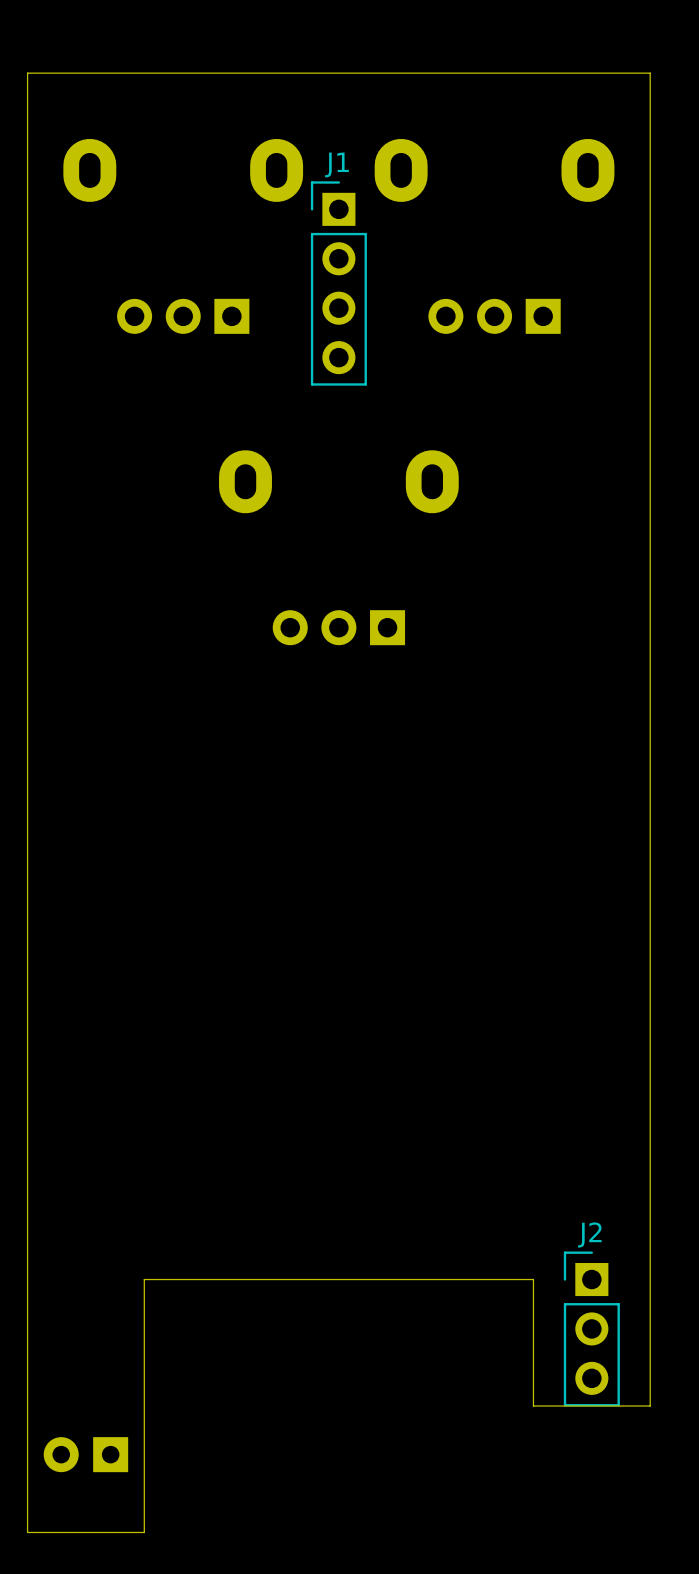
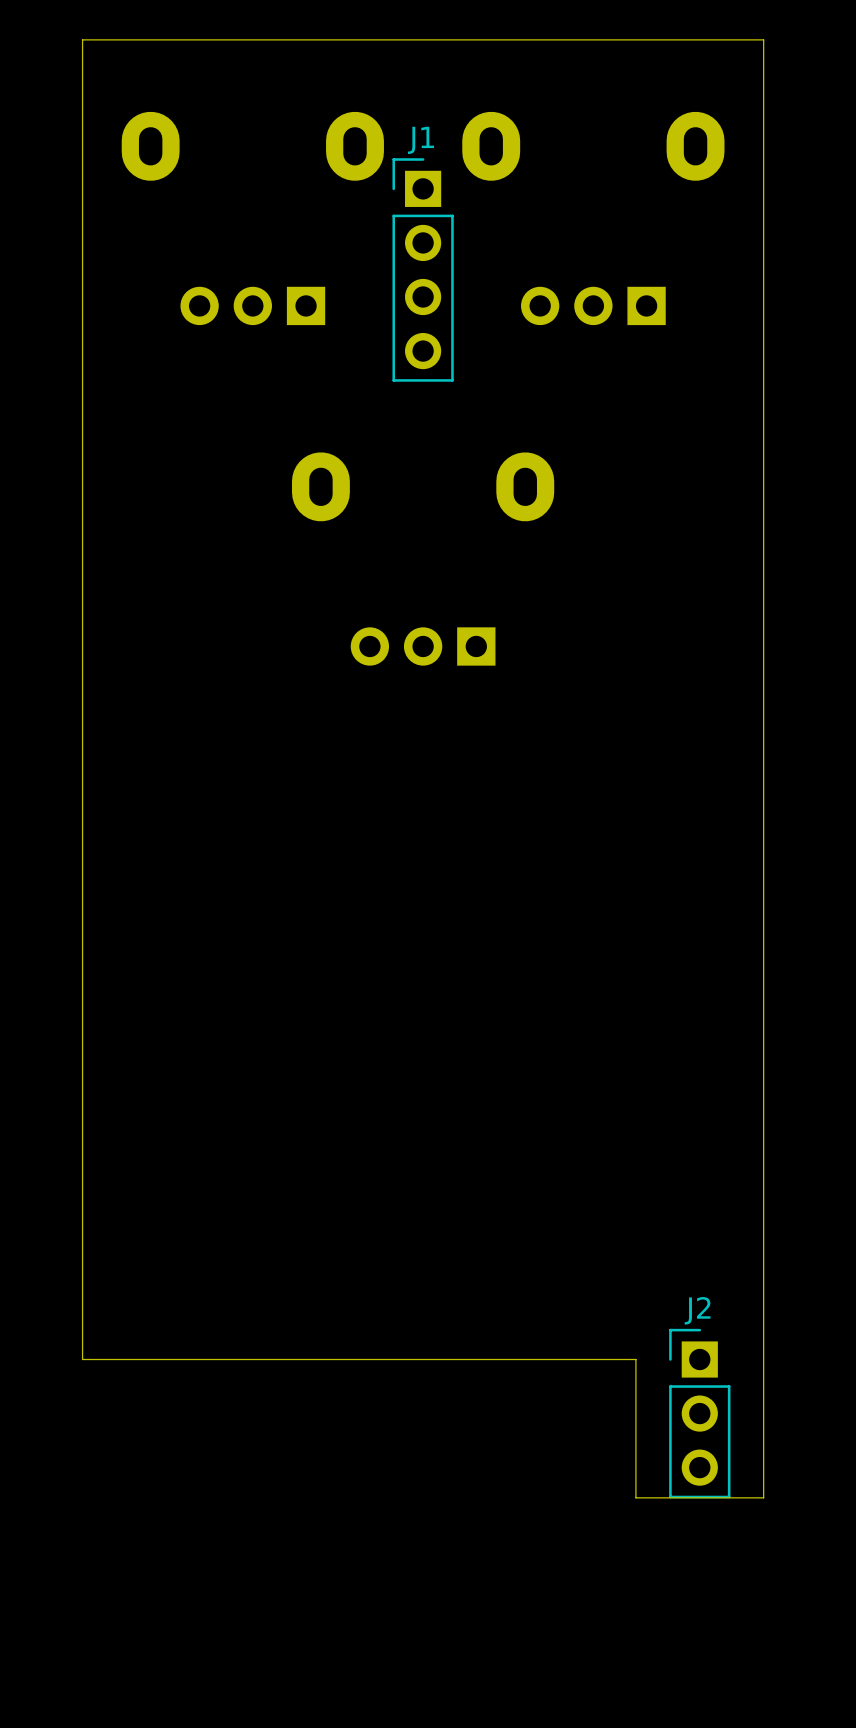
board edge: (144, 1279) (144, 1532) (27, 1532) (27, 1279) -> (210, 1359) (82, 1359)
part: (85, 1454) -> none

